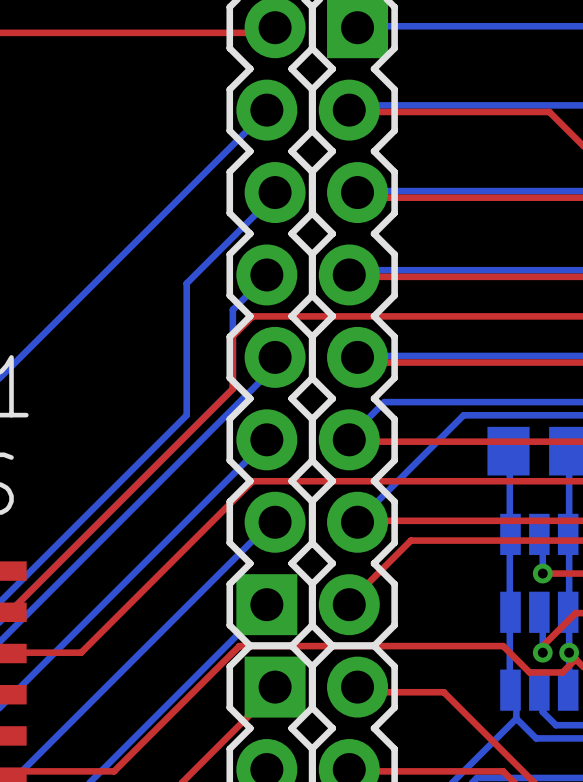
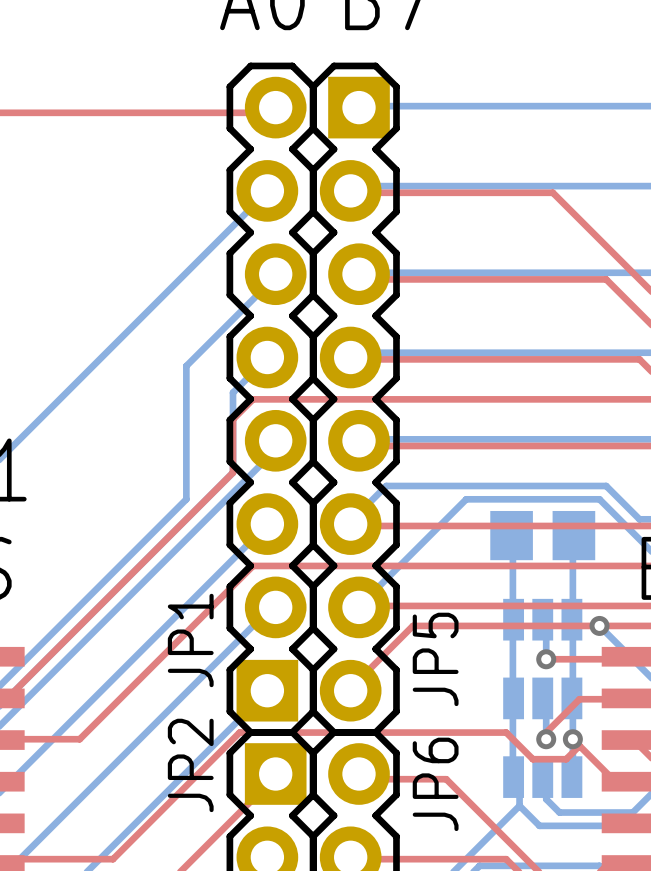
JP1 name: none -> JP1 (190, 640)
JP5 name: none -> JP5 (435, 659)
JP2 name: none -> JP2 (190, 765)
JP6 name: none -> JP6 (435, 784)

